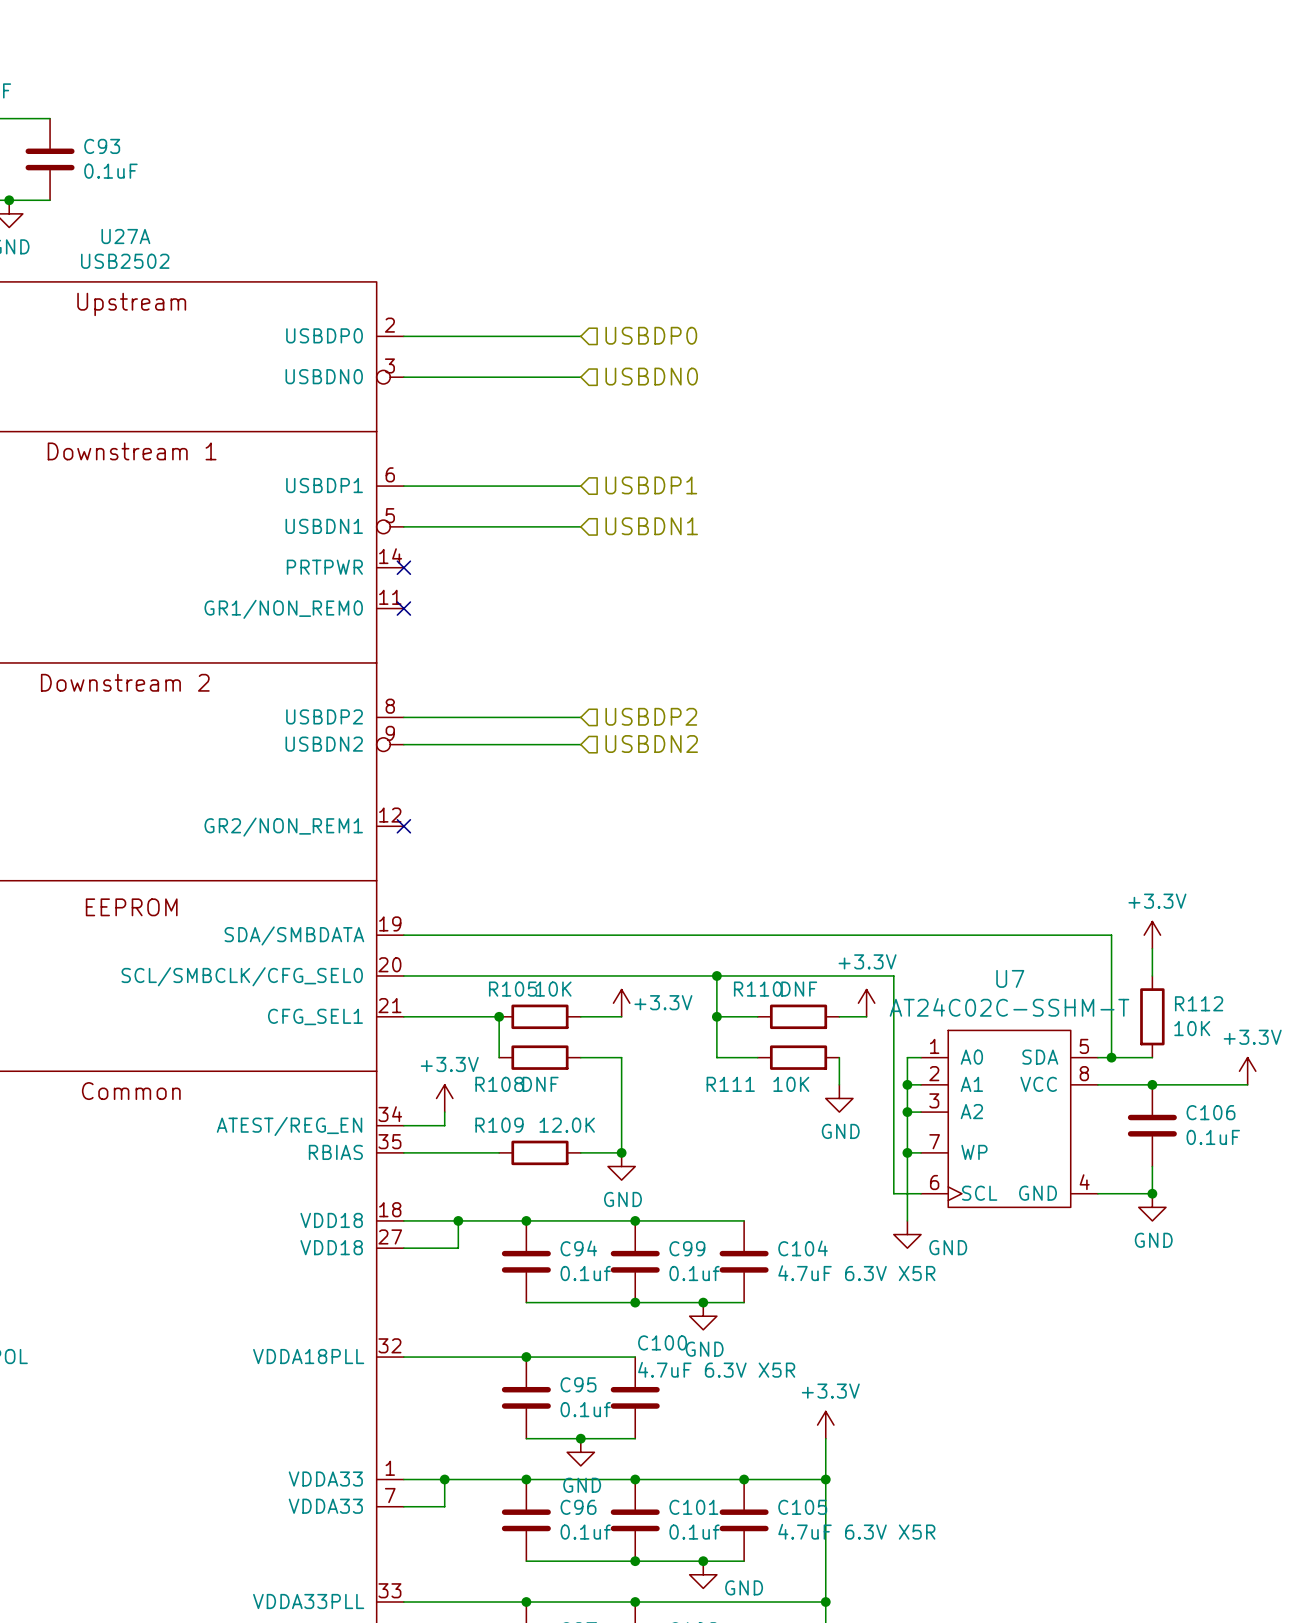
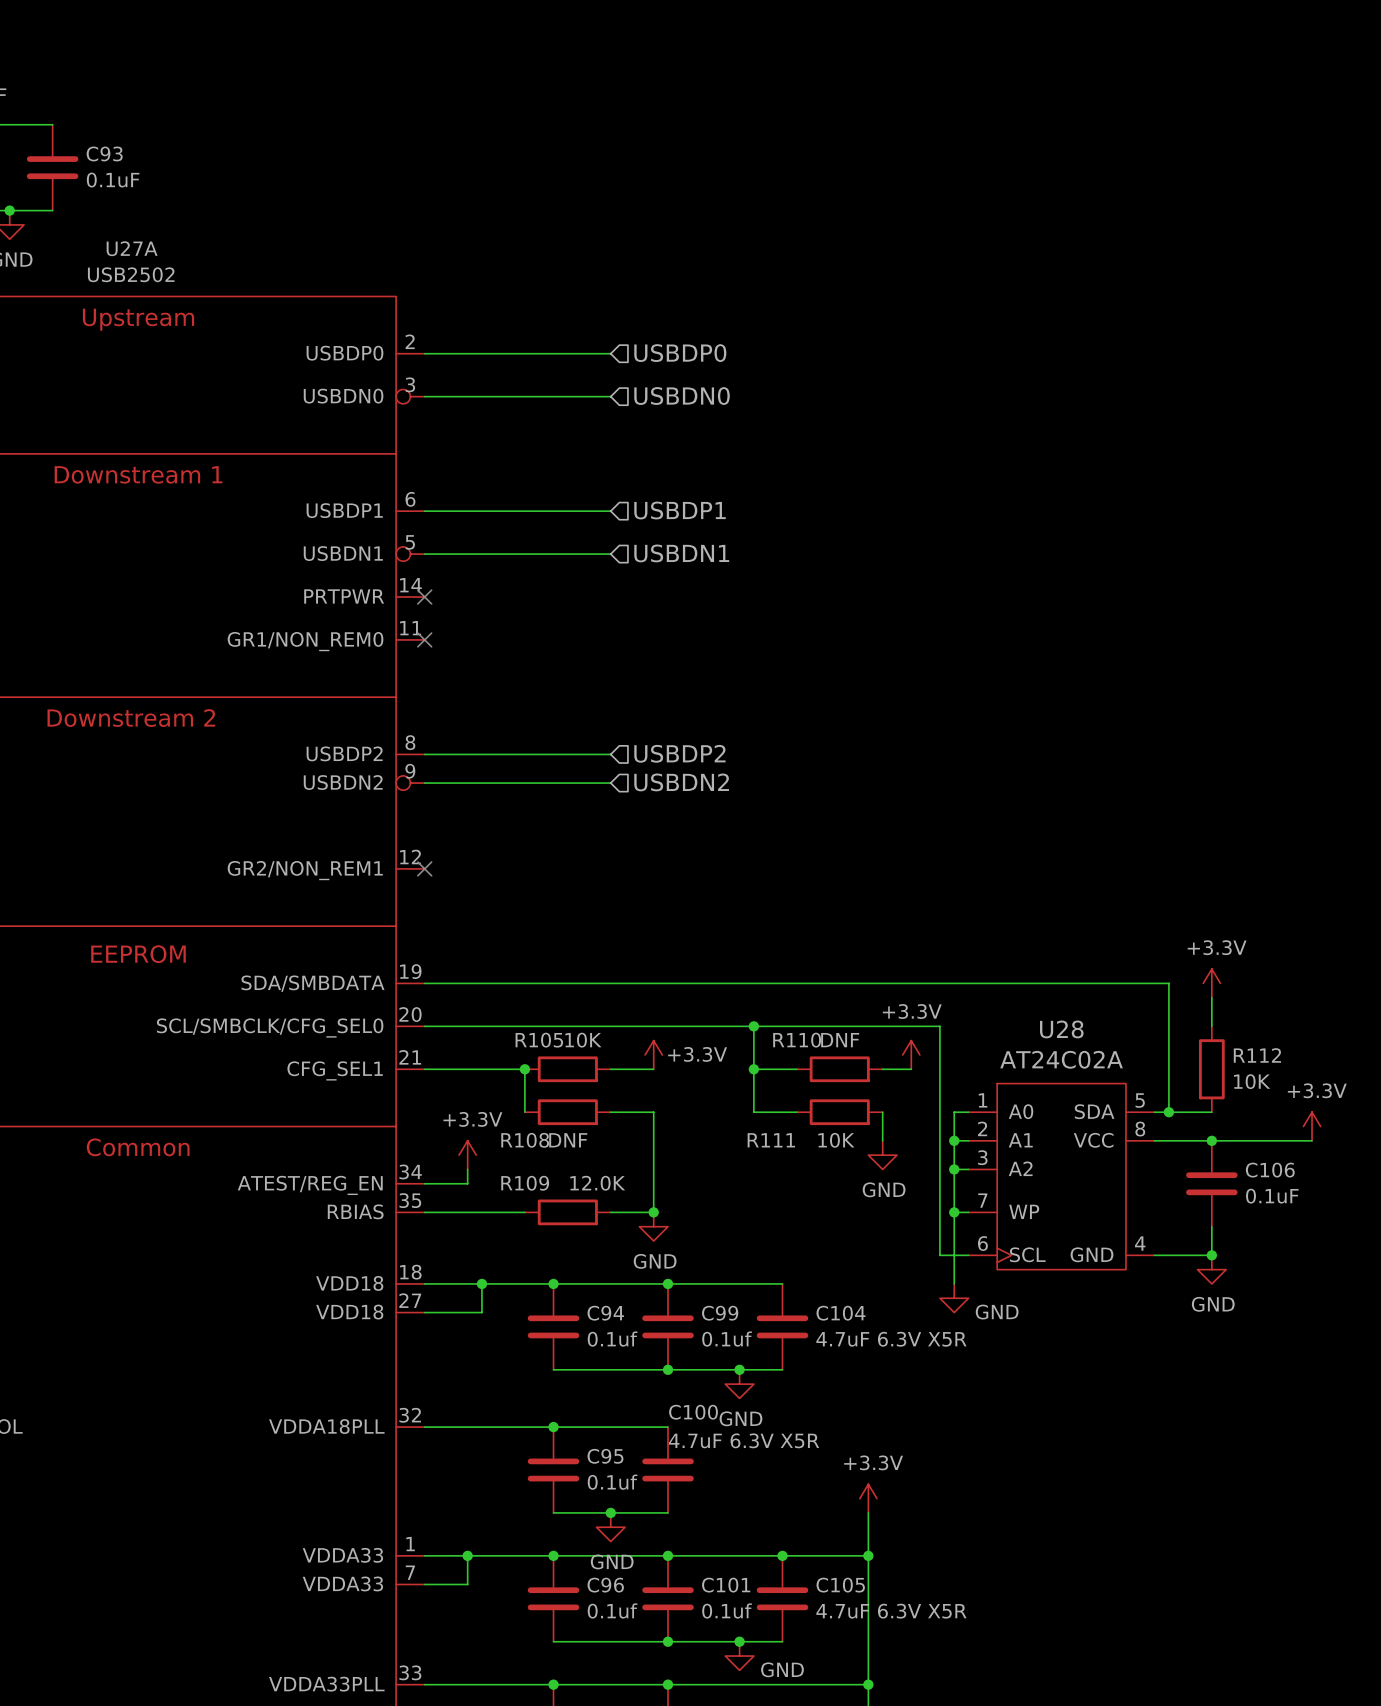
U7 name: U7 (1010, 978) -> U28 (1061, 1029)
U7 value: AT24C02C-SSHM-T (1009, 1007) -> AT24C02A (1061, 1059)

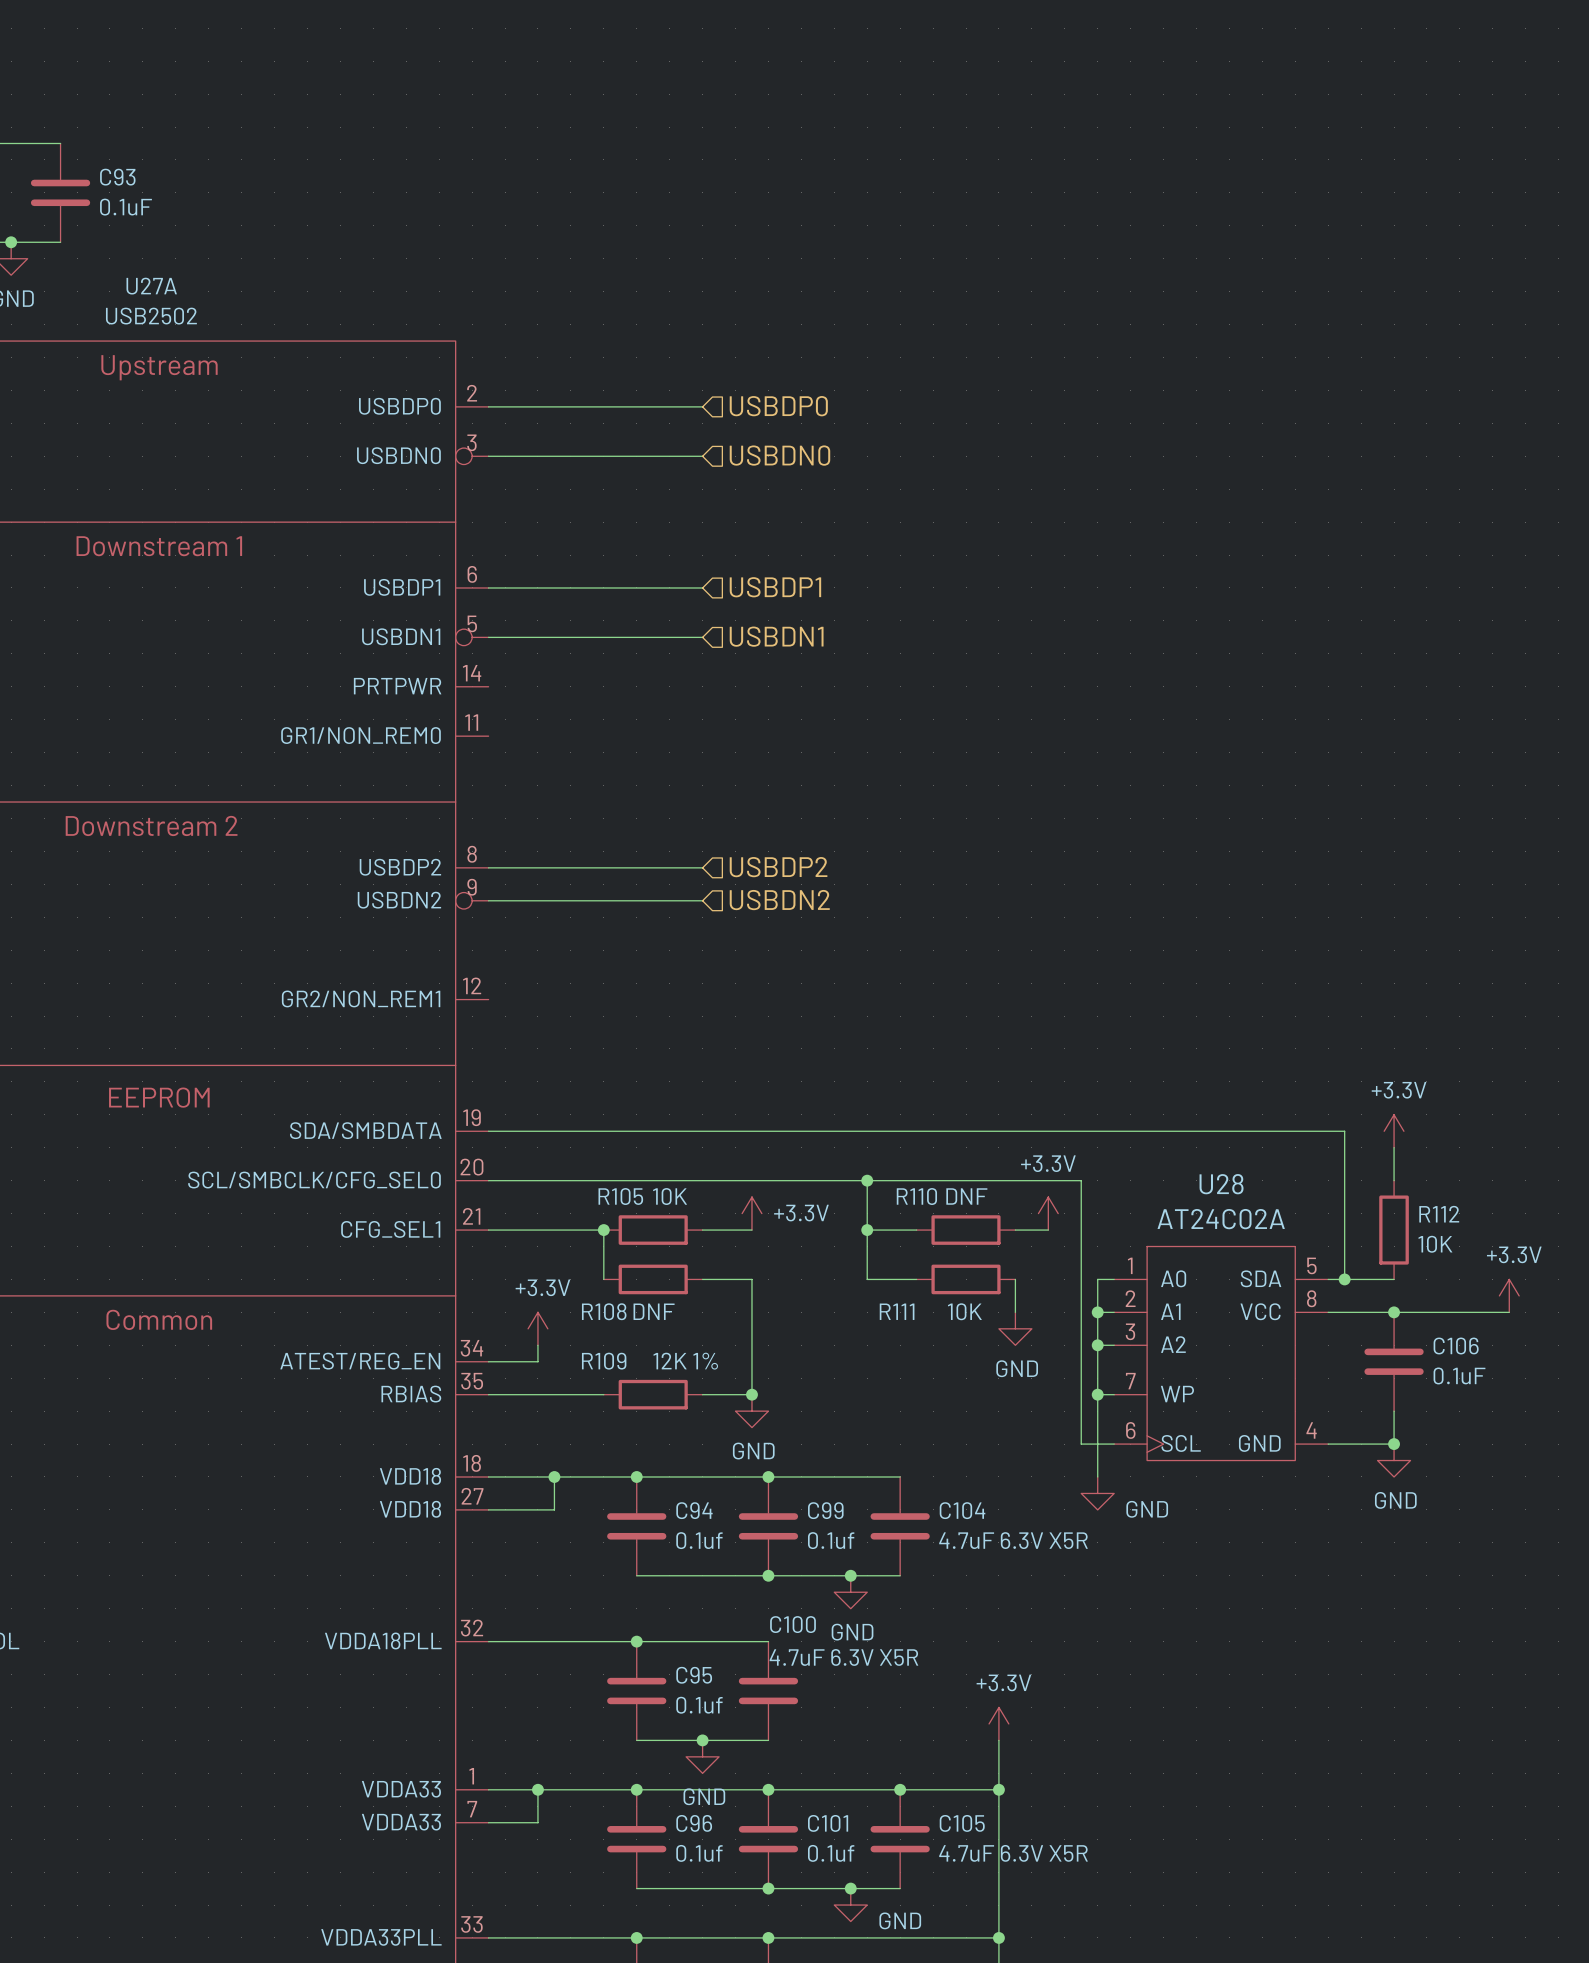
no-connect mark: (424, 597) -> none
no-connect mark: (424, 639) -> none
no-connect mark: (424, 868) -> none
R109 value: 12.0K (597, 1183) -> 12K 1% (685, 1361)

